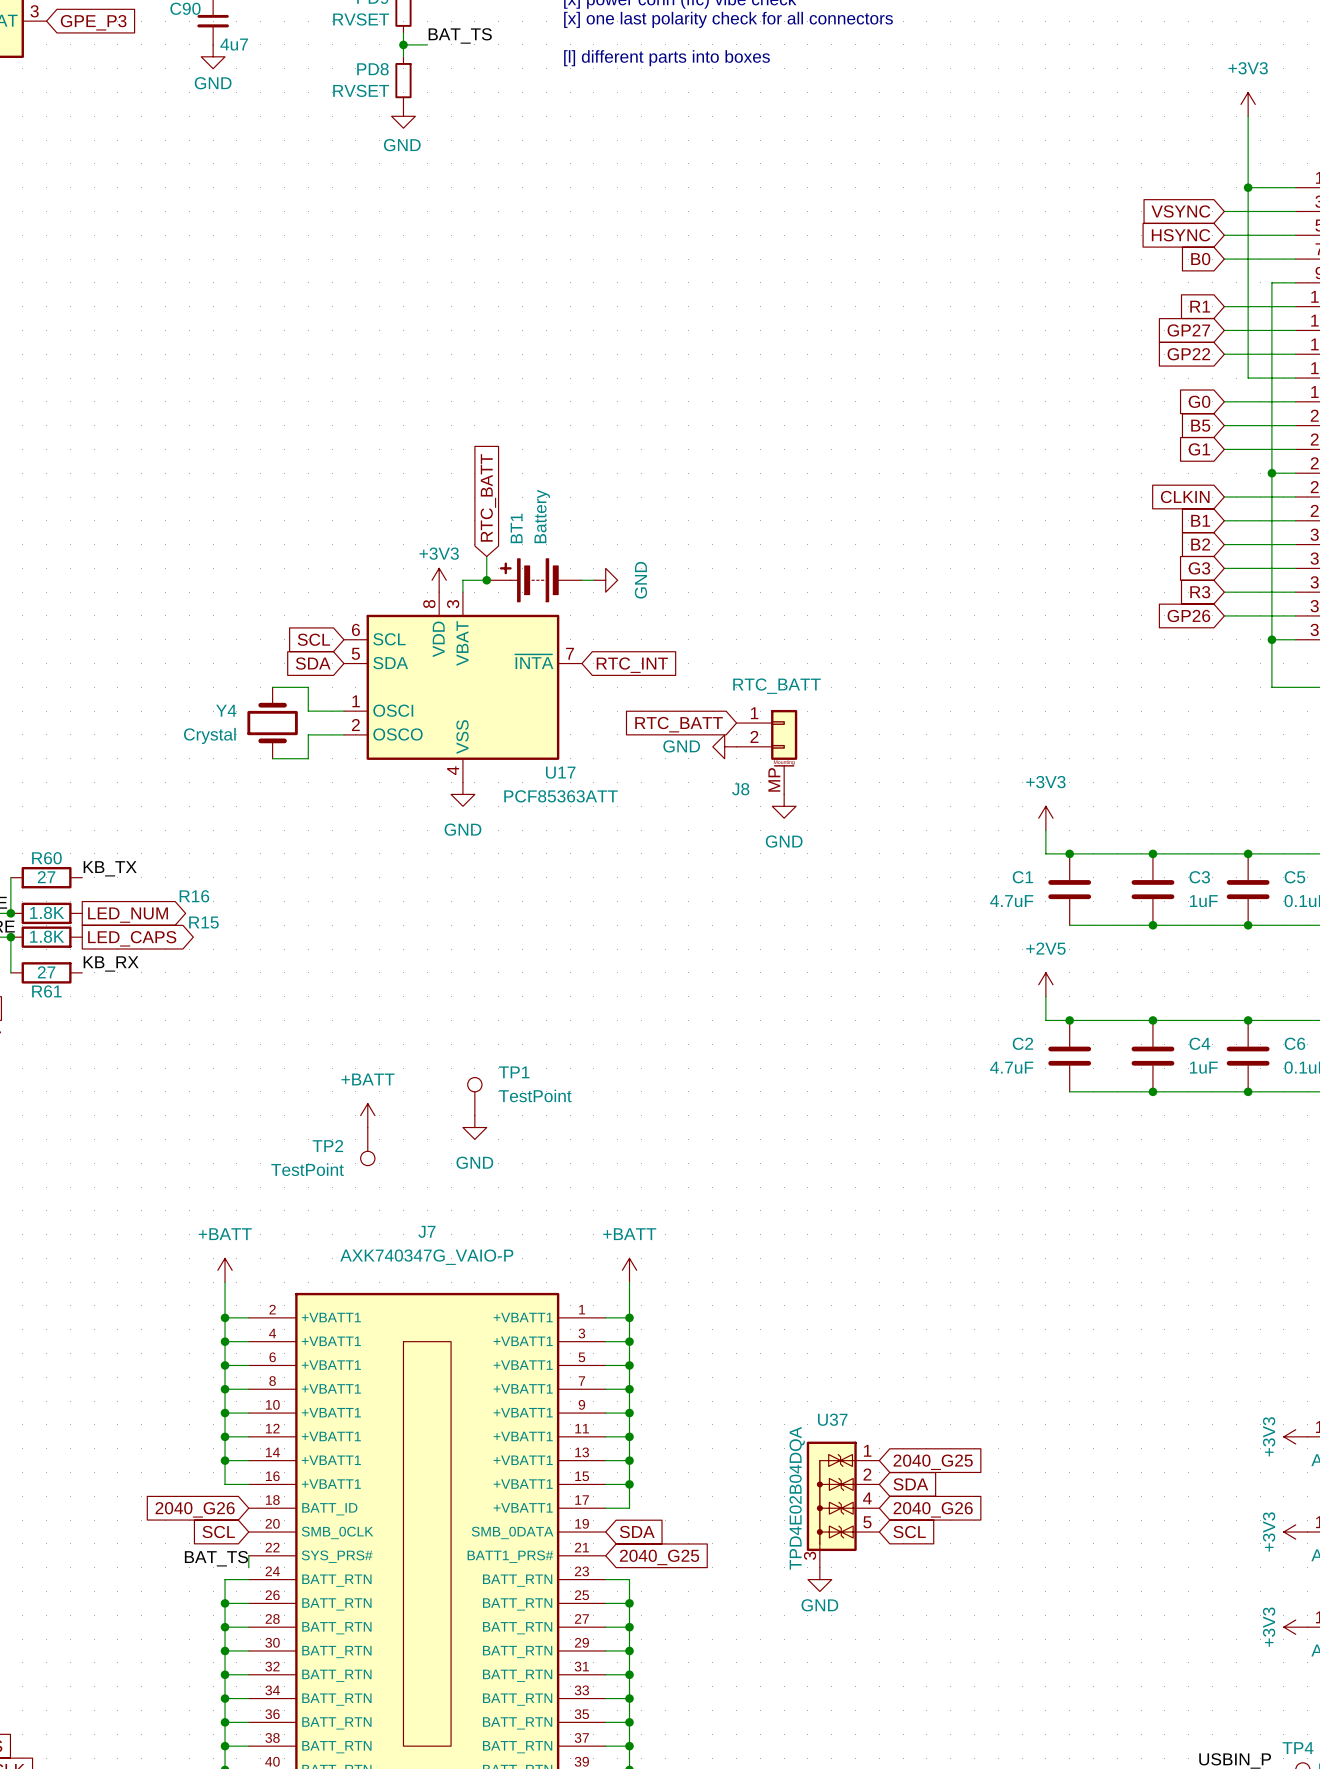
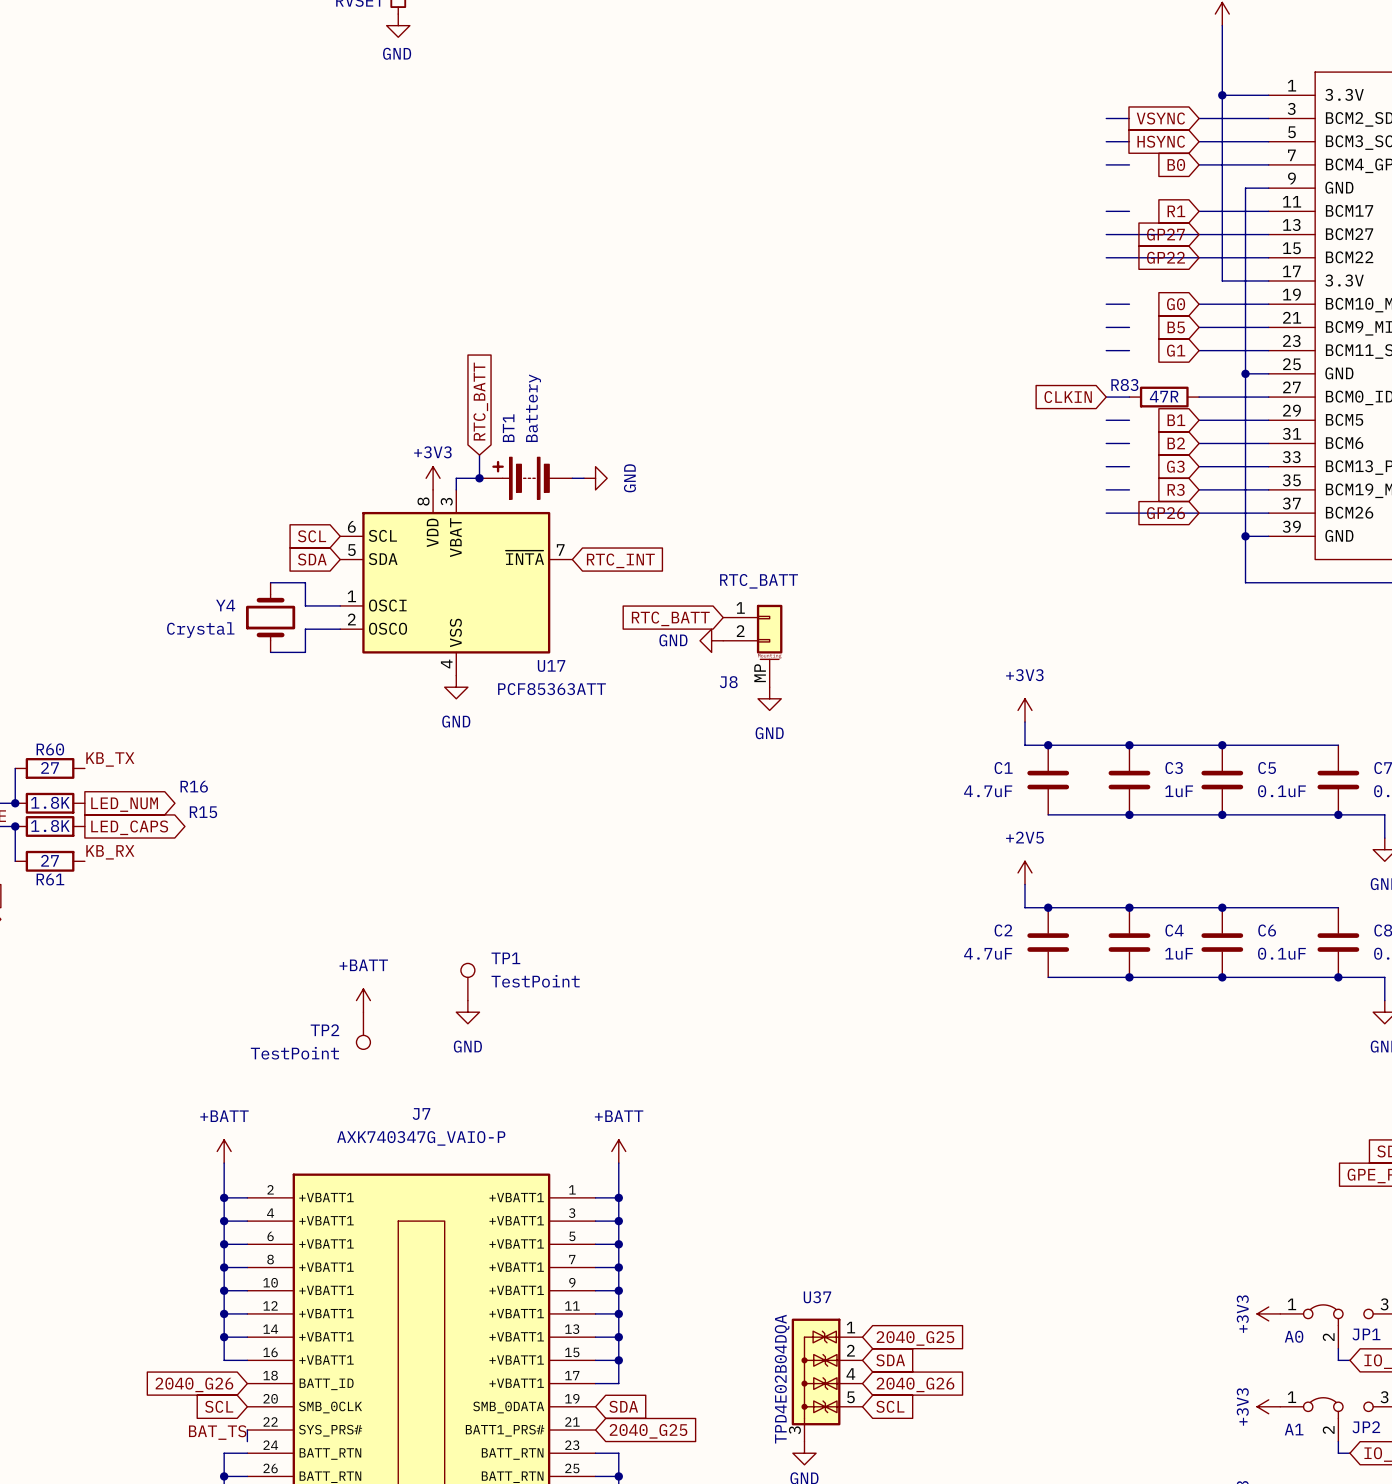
wire: none -> (1106, 118) (1129, 118)
wire: none -> (1106, 141) (1129, 141)
wire: none -> (1106, 164) (1129, 164)
wire: none -> (1106, 211) (1129, 211)
wire: none -> (1106, 234) (1199, 234)
wire: none -> (1106, 257) (1199, 257)
wire: none -> (1106, 304) (1129, 304)
wire: none -> (1106, 327) (1129, 327)
wire: none -> (1106, 350) (1129, 350)
global label position: CLKIN (1185, 496) -> CLKIN (1068, 397)
wire: none -> (1106, 397) (1129, 397)
R83: none -> 47R (1164, 397)
wire: none -> (1106, 420) (1129, 420)
wire: none -> (1106, 443) (1129, 443)
wire: none -> (1106, 466) (1129, 466)
wire: none -> (1106, 489) (1129, 489)
wire: none -> (1106, 513) (1199, 513)

